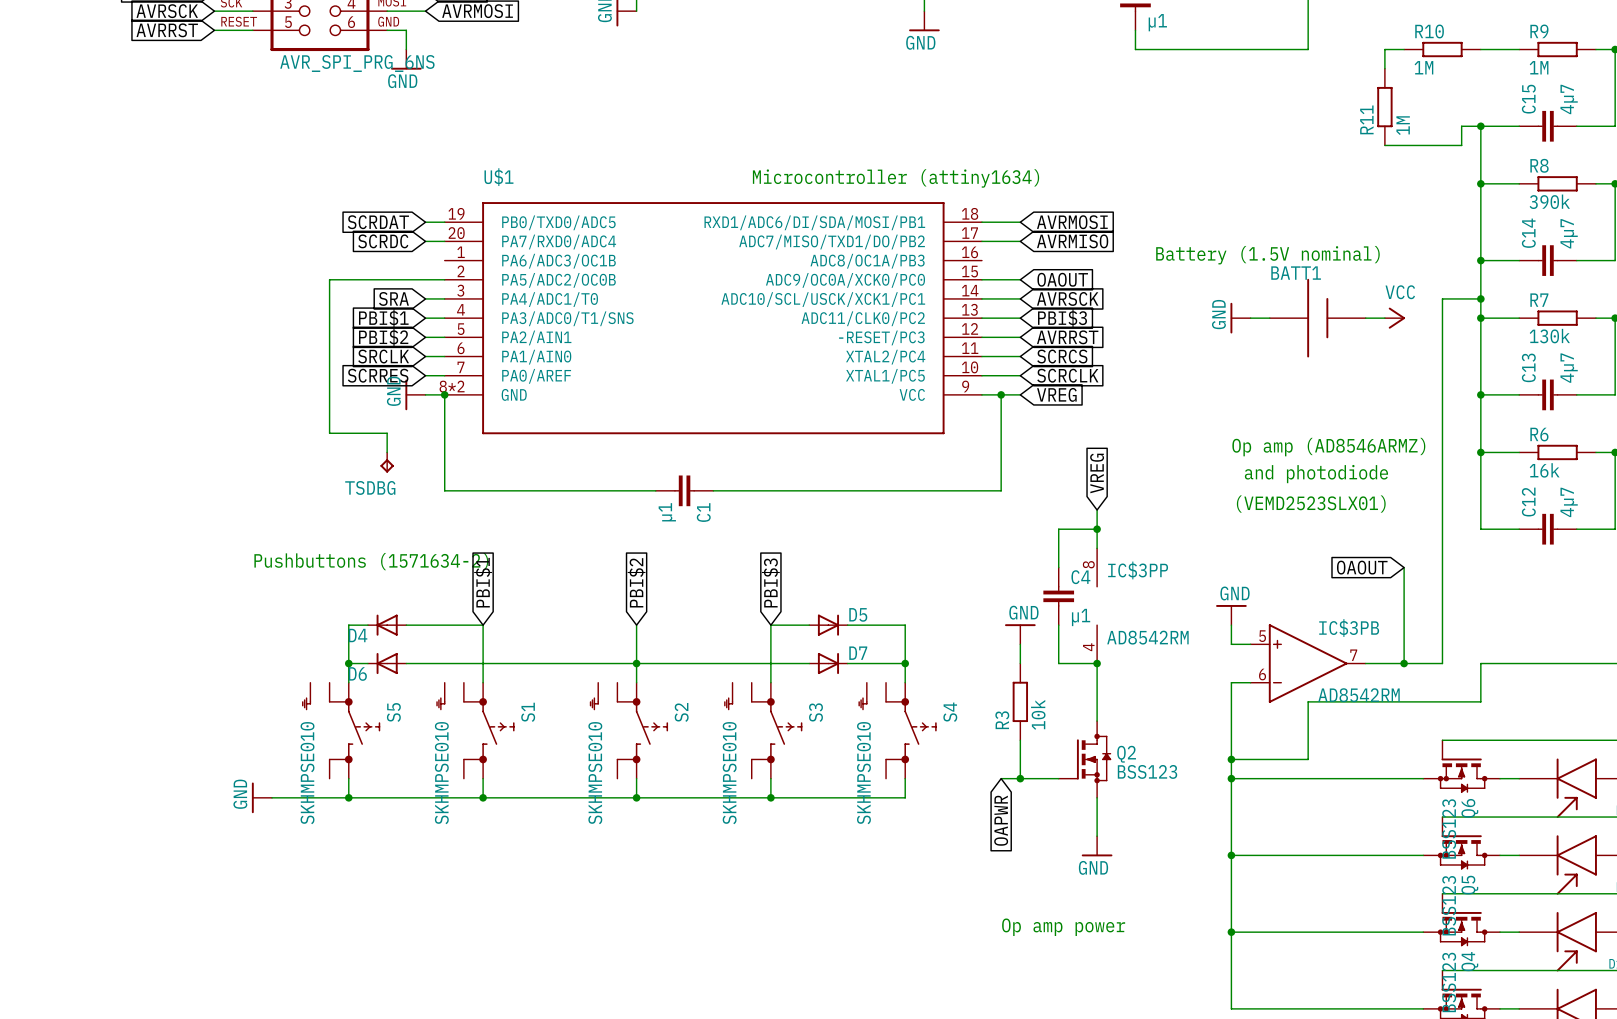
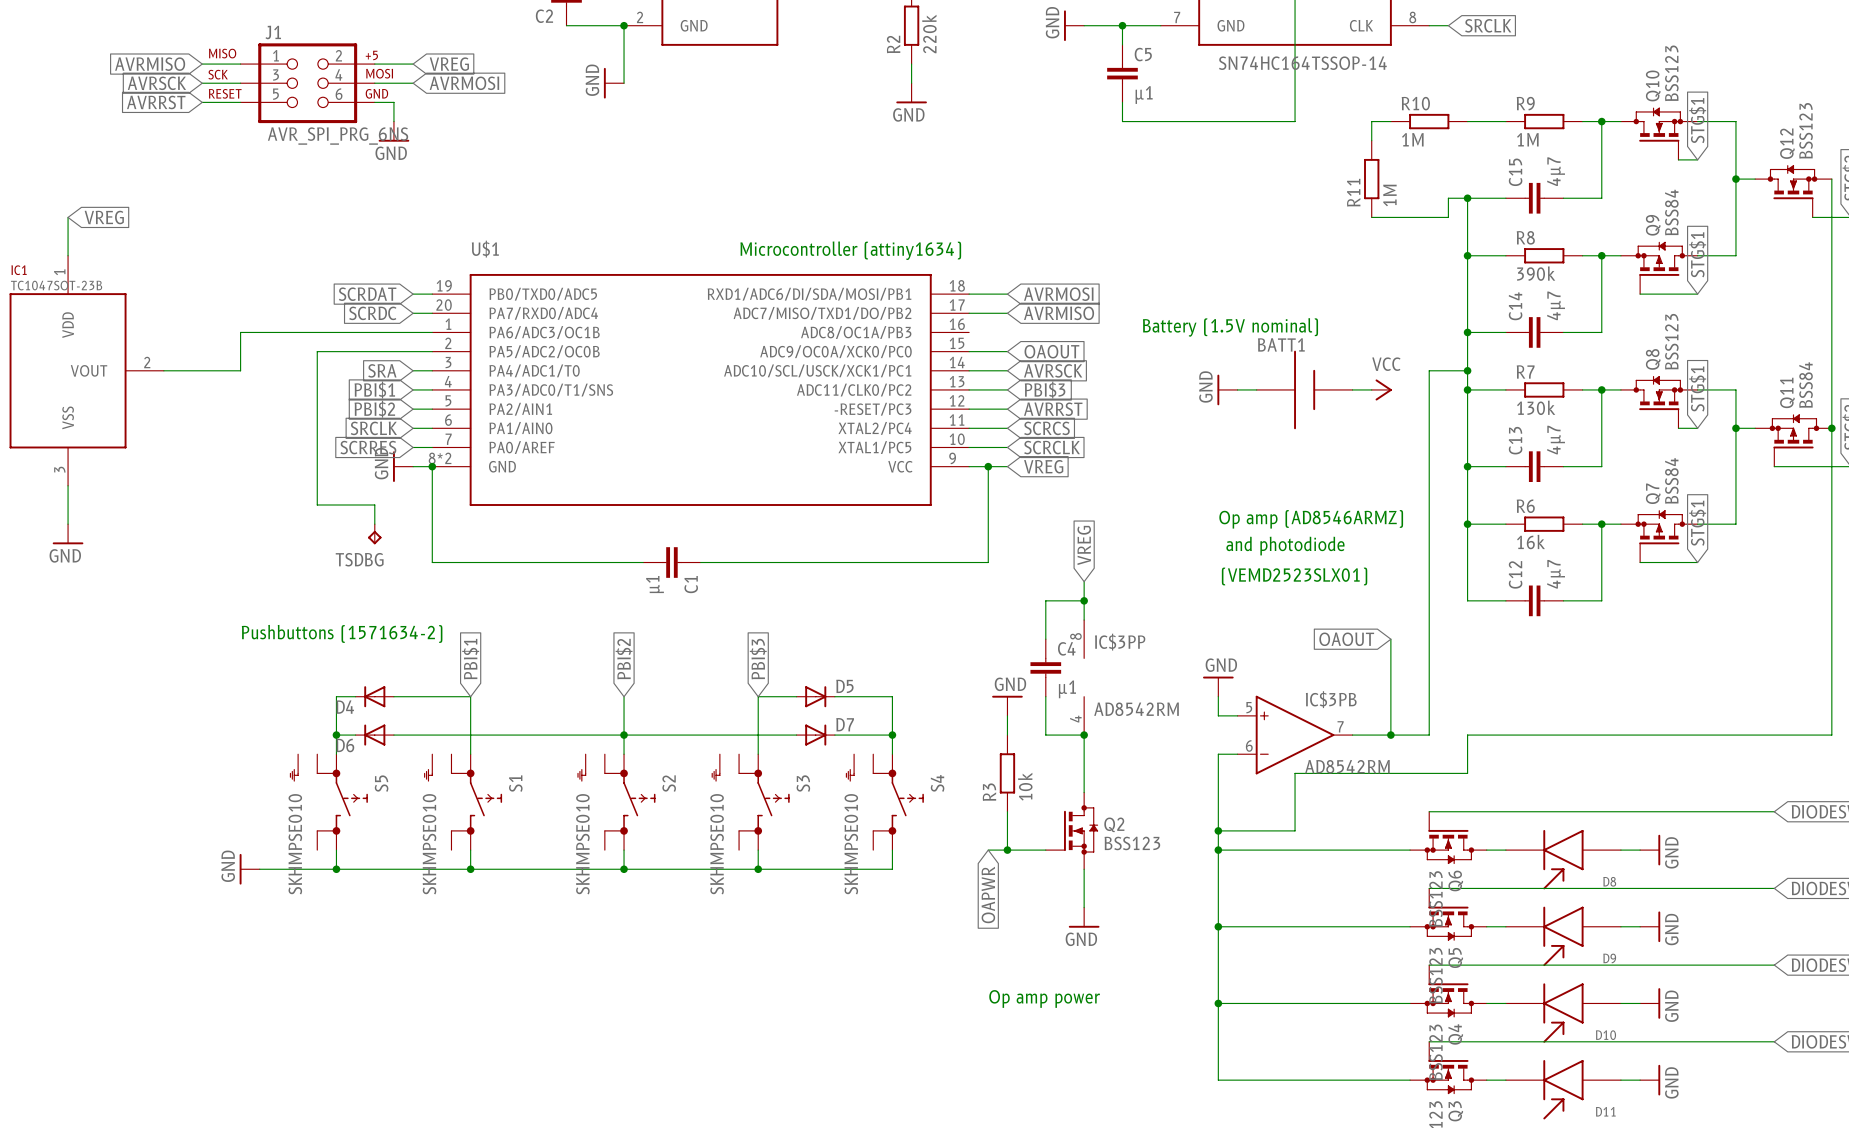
wire: none -> (68, 217) (68, 255)
global label: none -> VREG (104, 217)
wire: none -> (432, 332) (240, 332) (240, 370) (163, 370)
IC1: none -> TC1047SOT-23B (86, 370)
wire: none -> (68, 485) (68, 524)
power symbol: none -> GND (68, 534)

